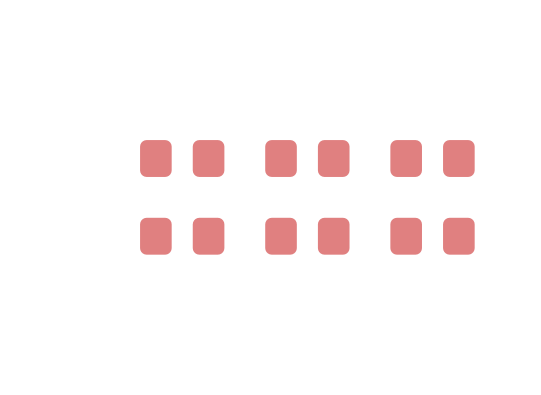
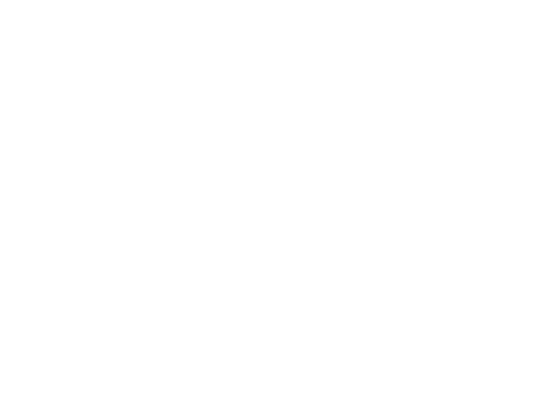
part: (182, 158) -> none
part: (307, 158) -> none
part: (432, 158) -> none
part: (182, 236) -> none
part: (307, 236) -> none
part: (432, 236) -> none

